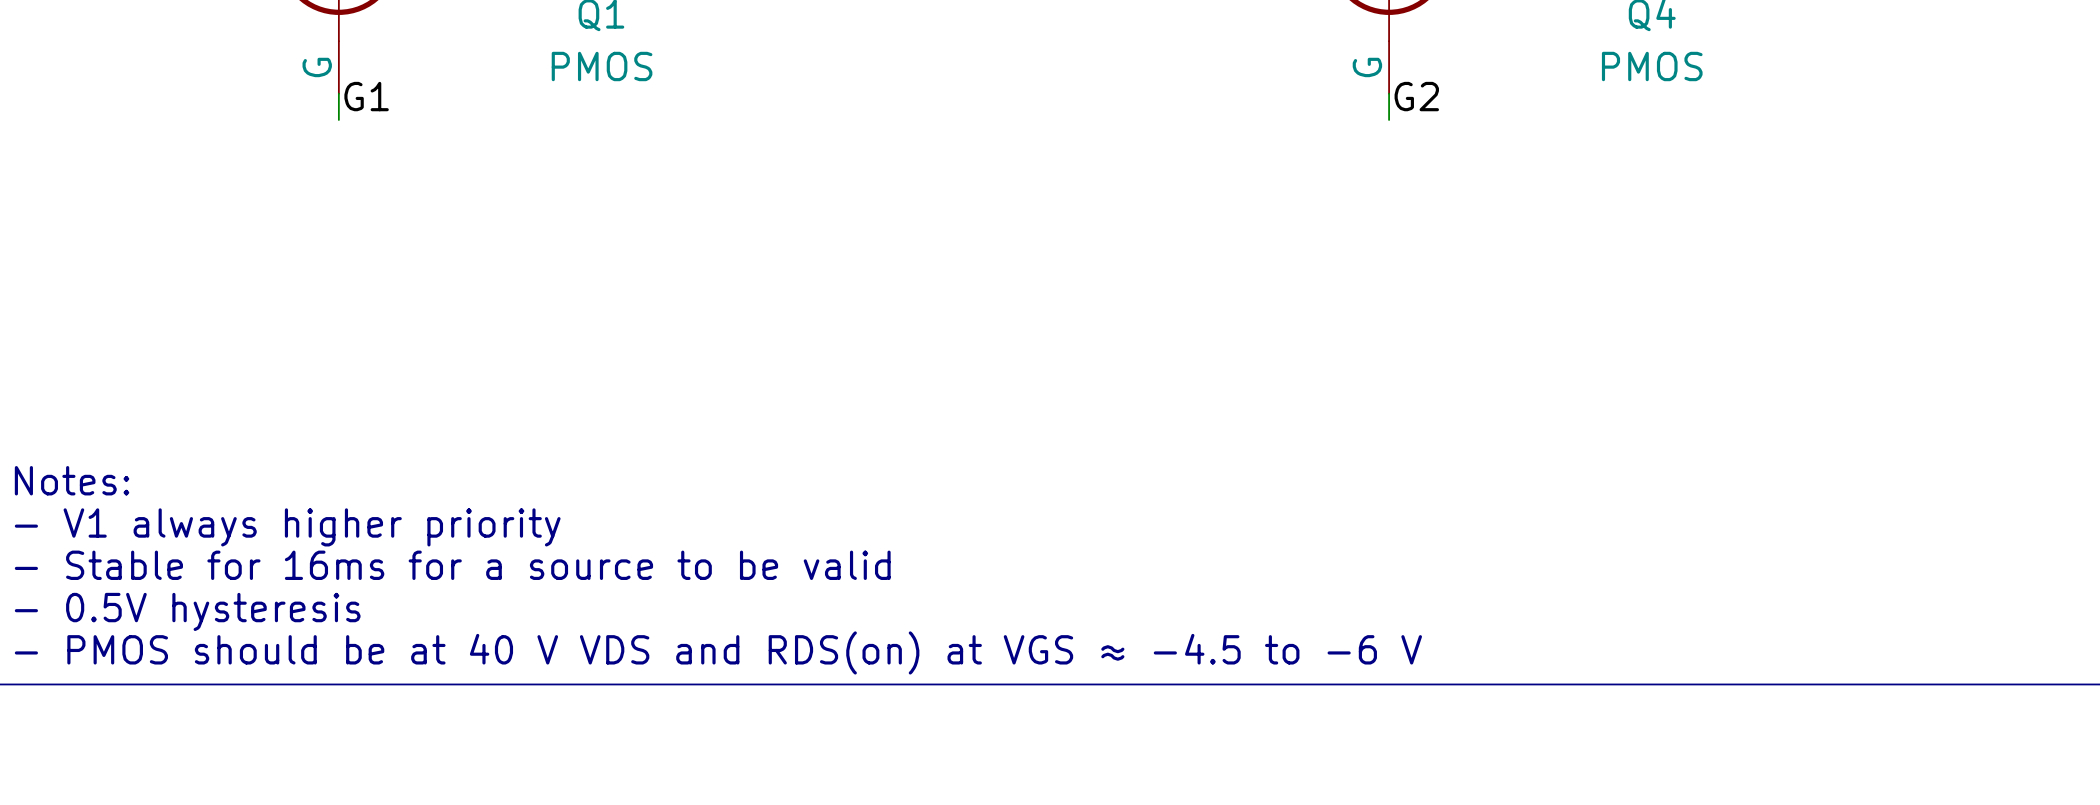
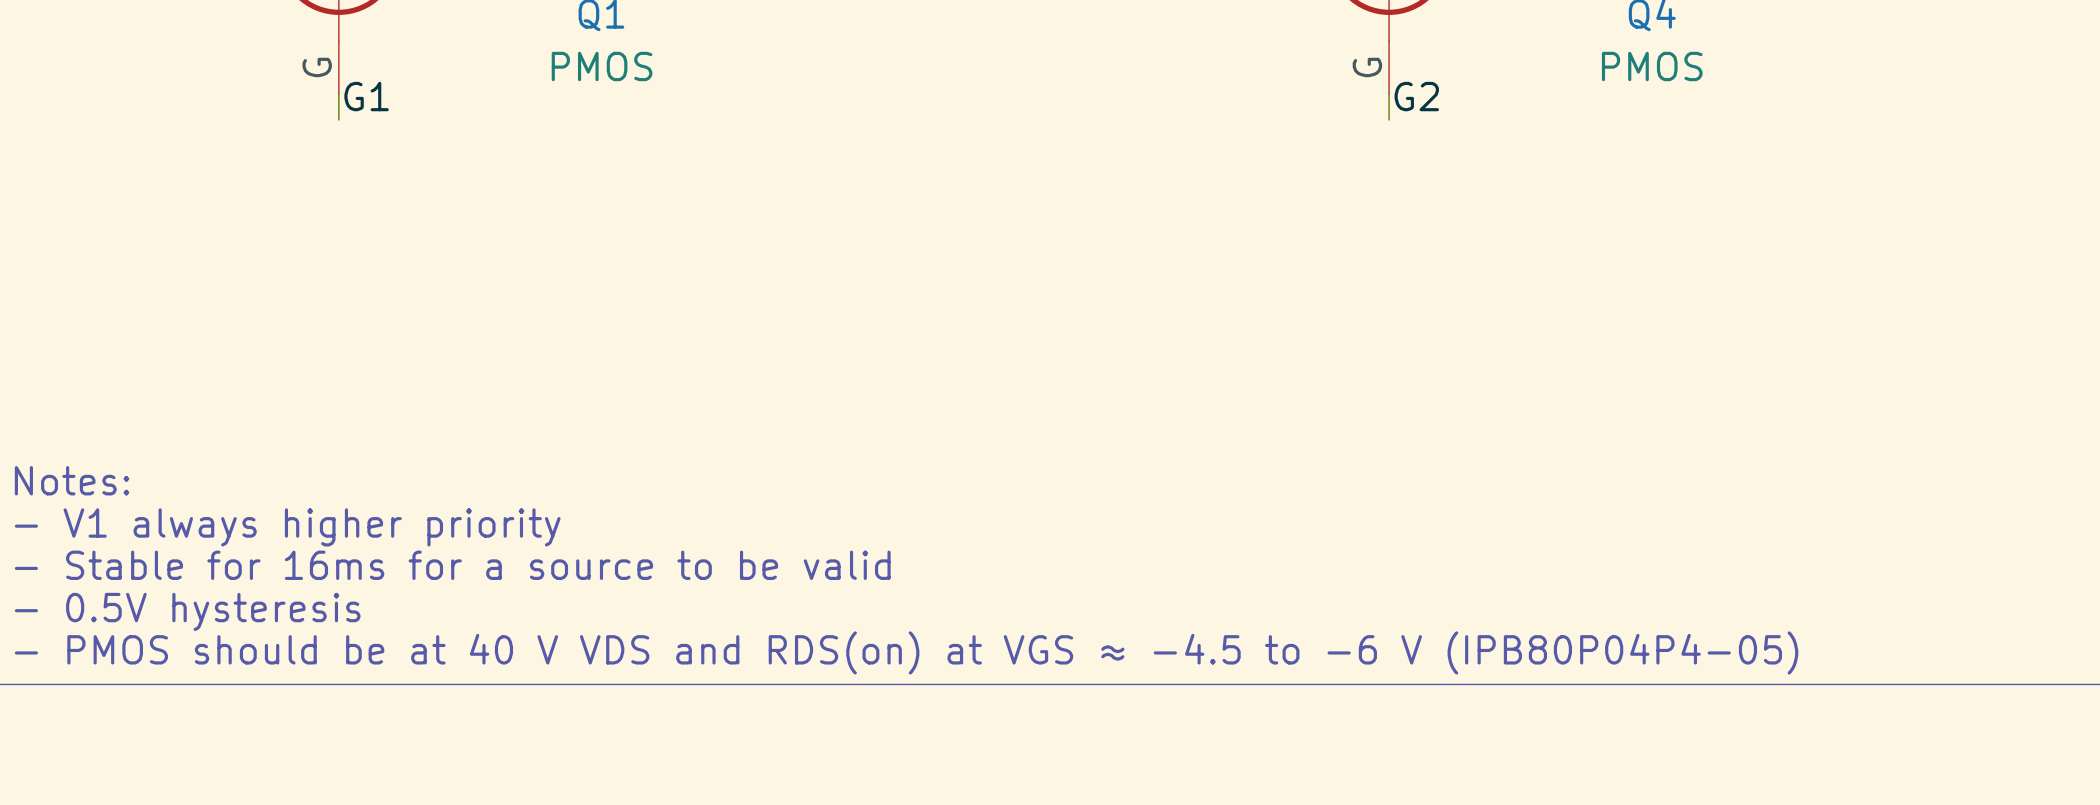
text: - PMOS should be at 40 V VDS and RDS(on) at VGS ≈ −4.5 to −6 V (718, 652) -> - PMOS should be at 40 V VDS and RDS(on) at VGS ≈ −4.5 to −6 V (IPB80P04P4-05) (906, 652)

